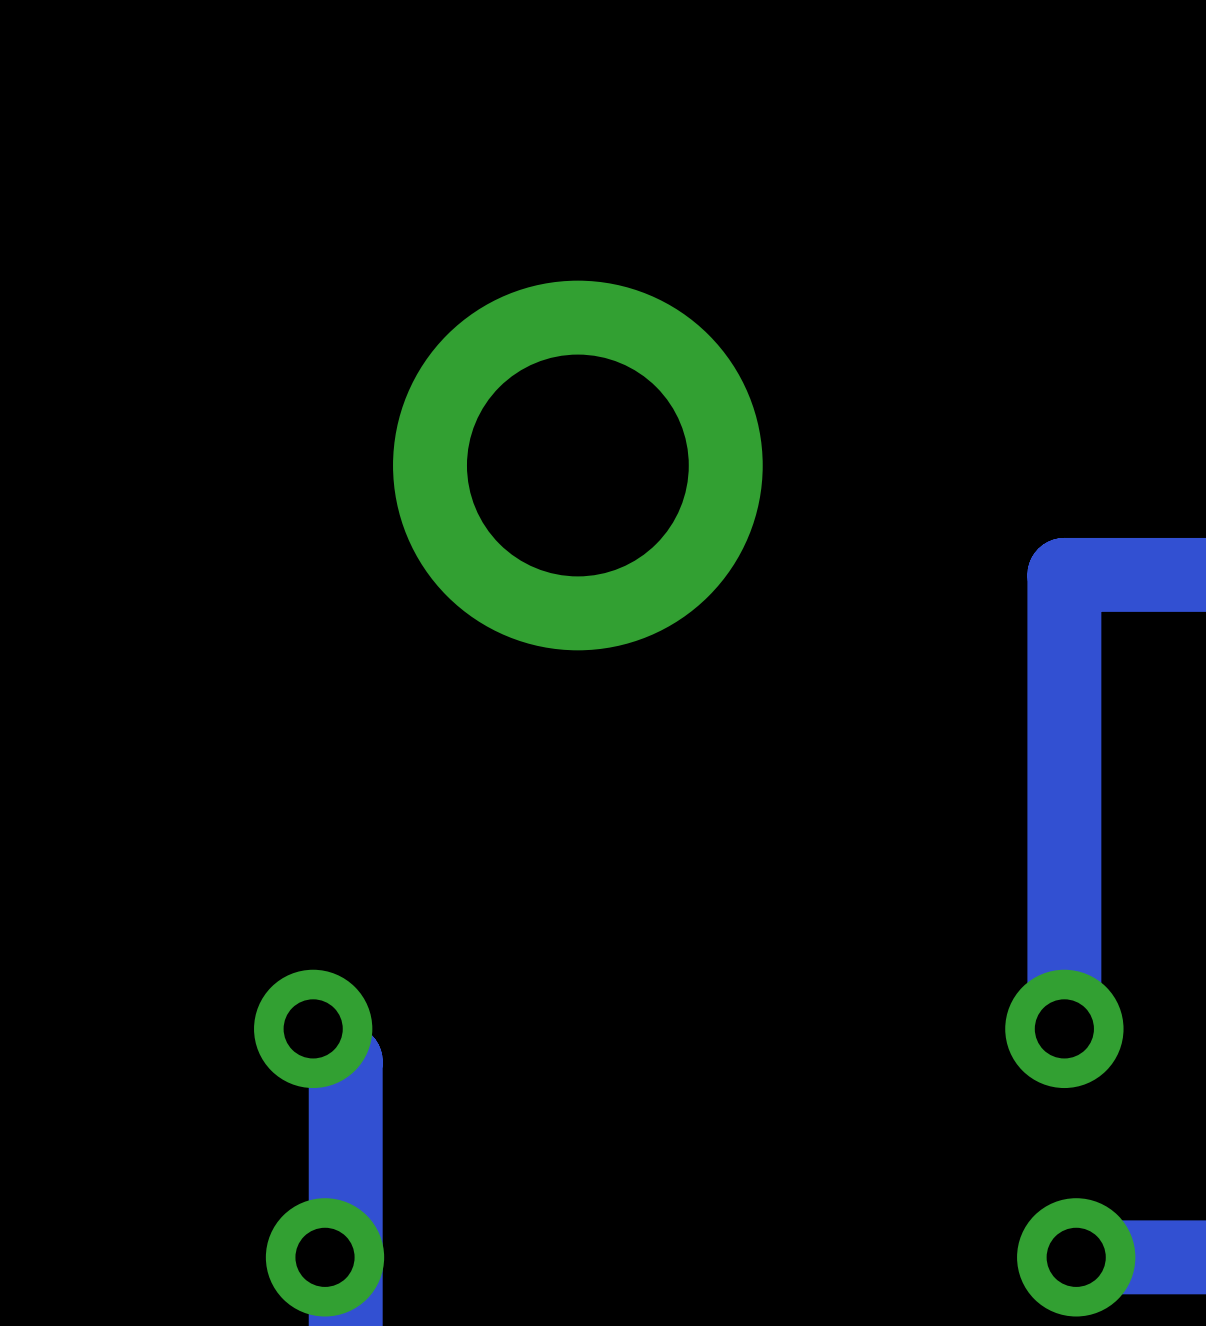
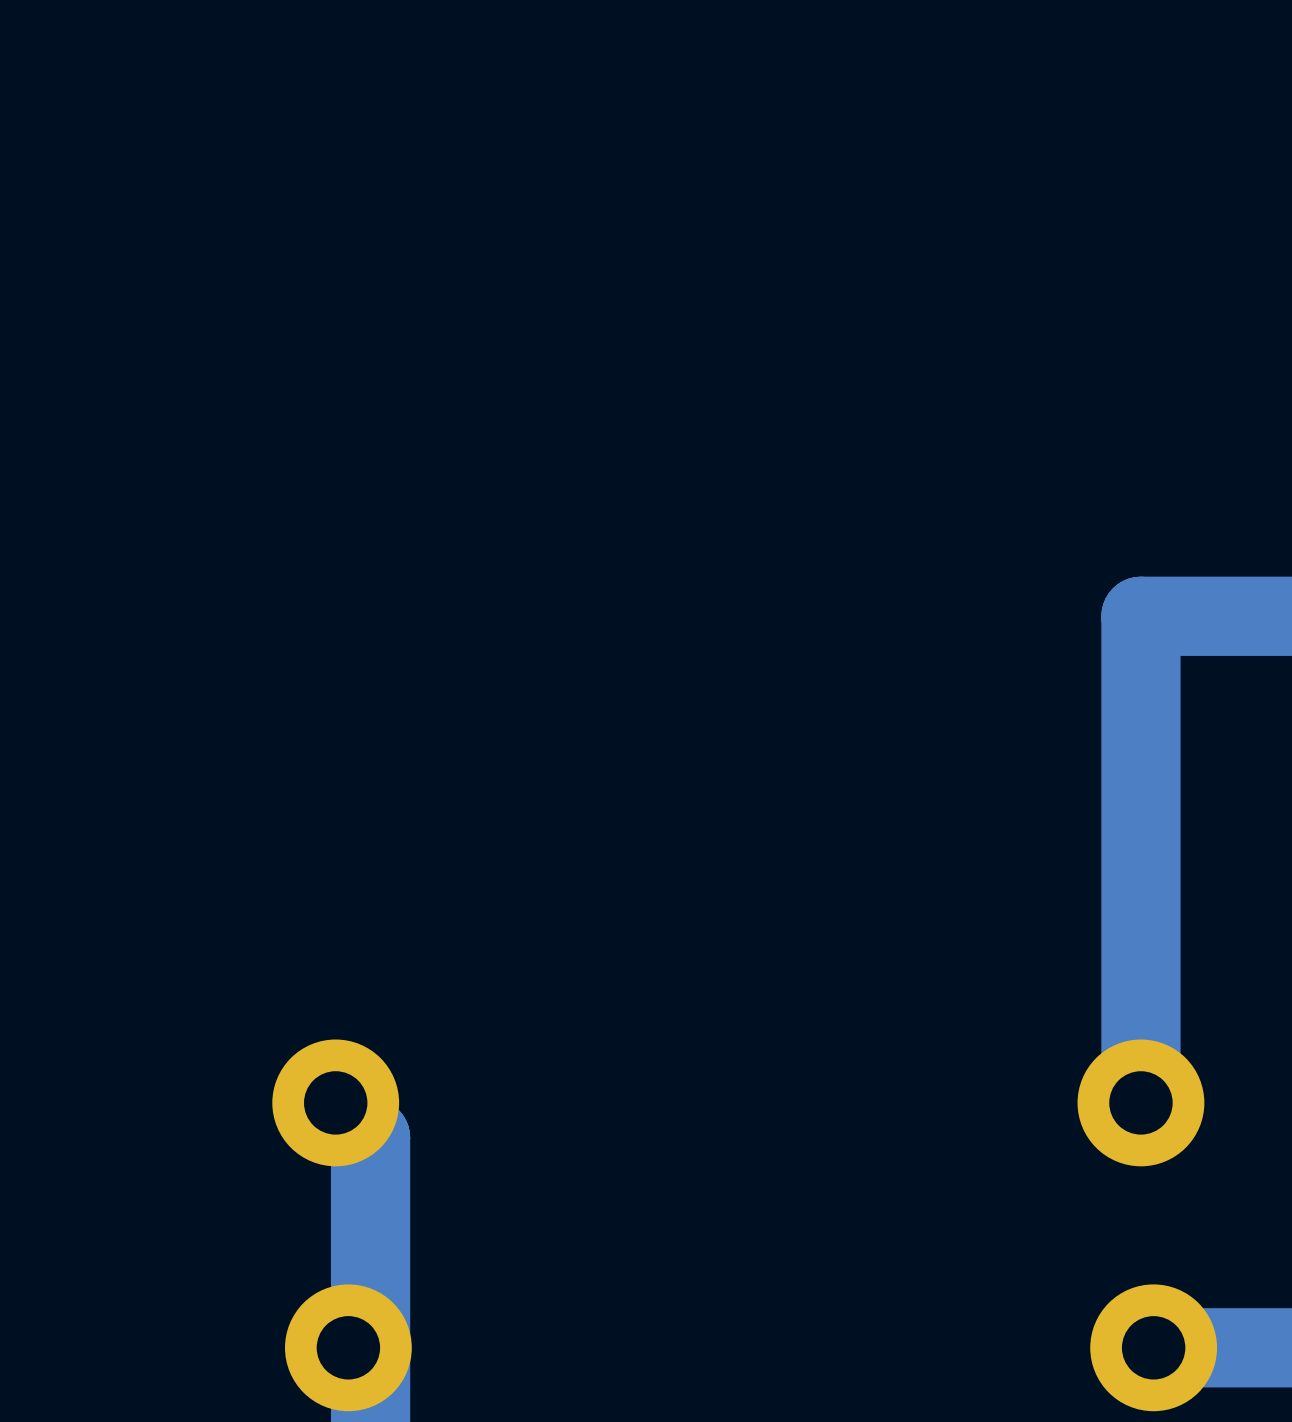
via: (577, 465) -> none

